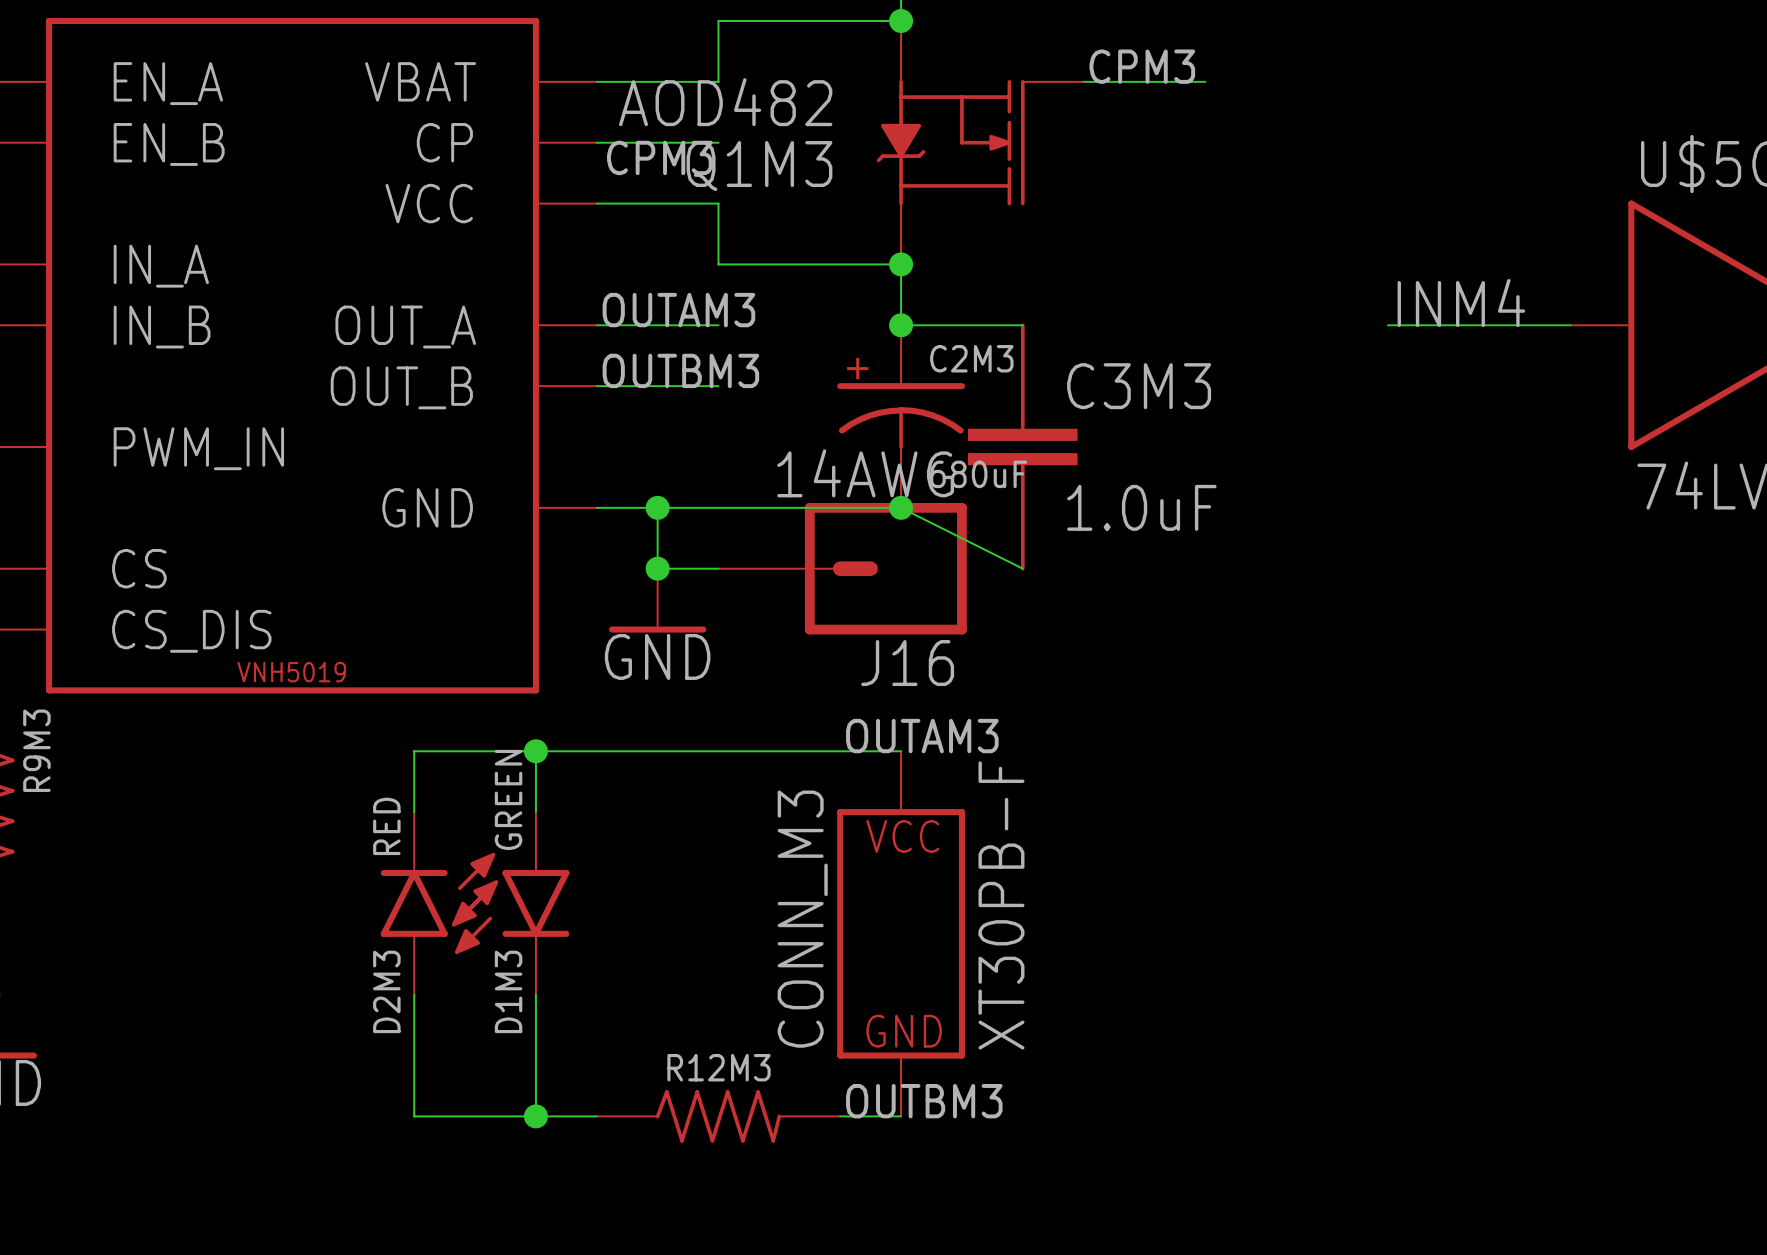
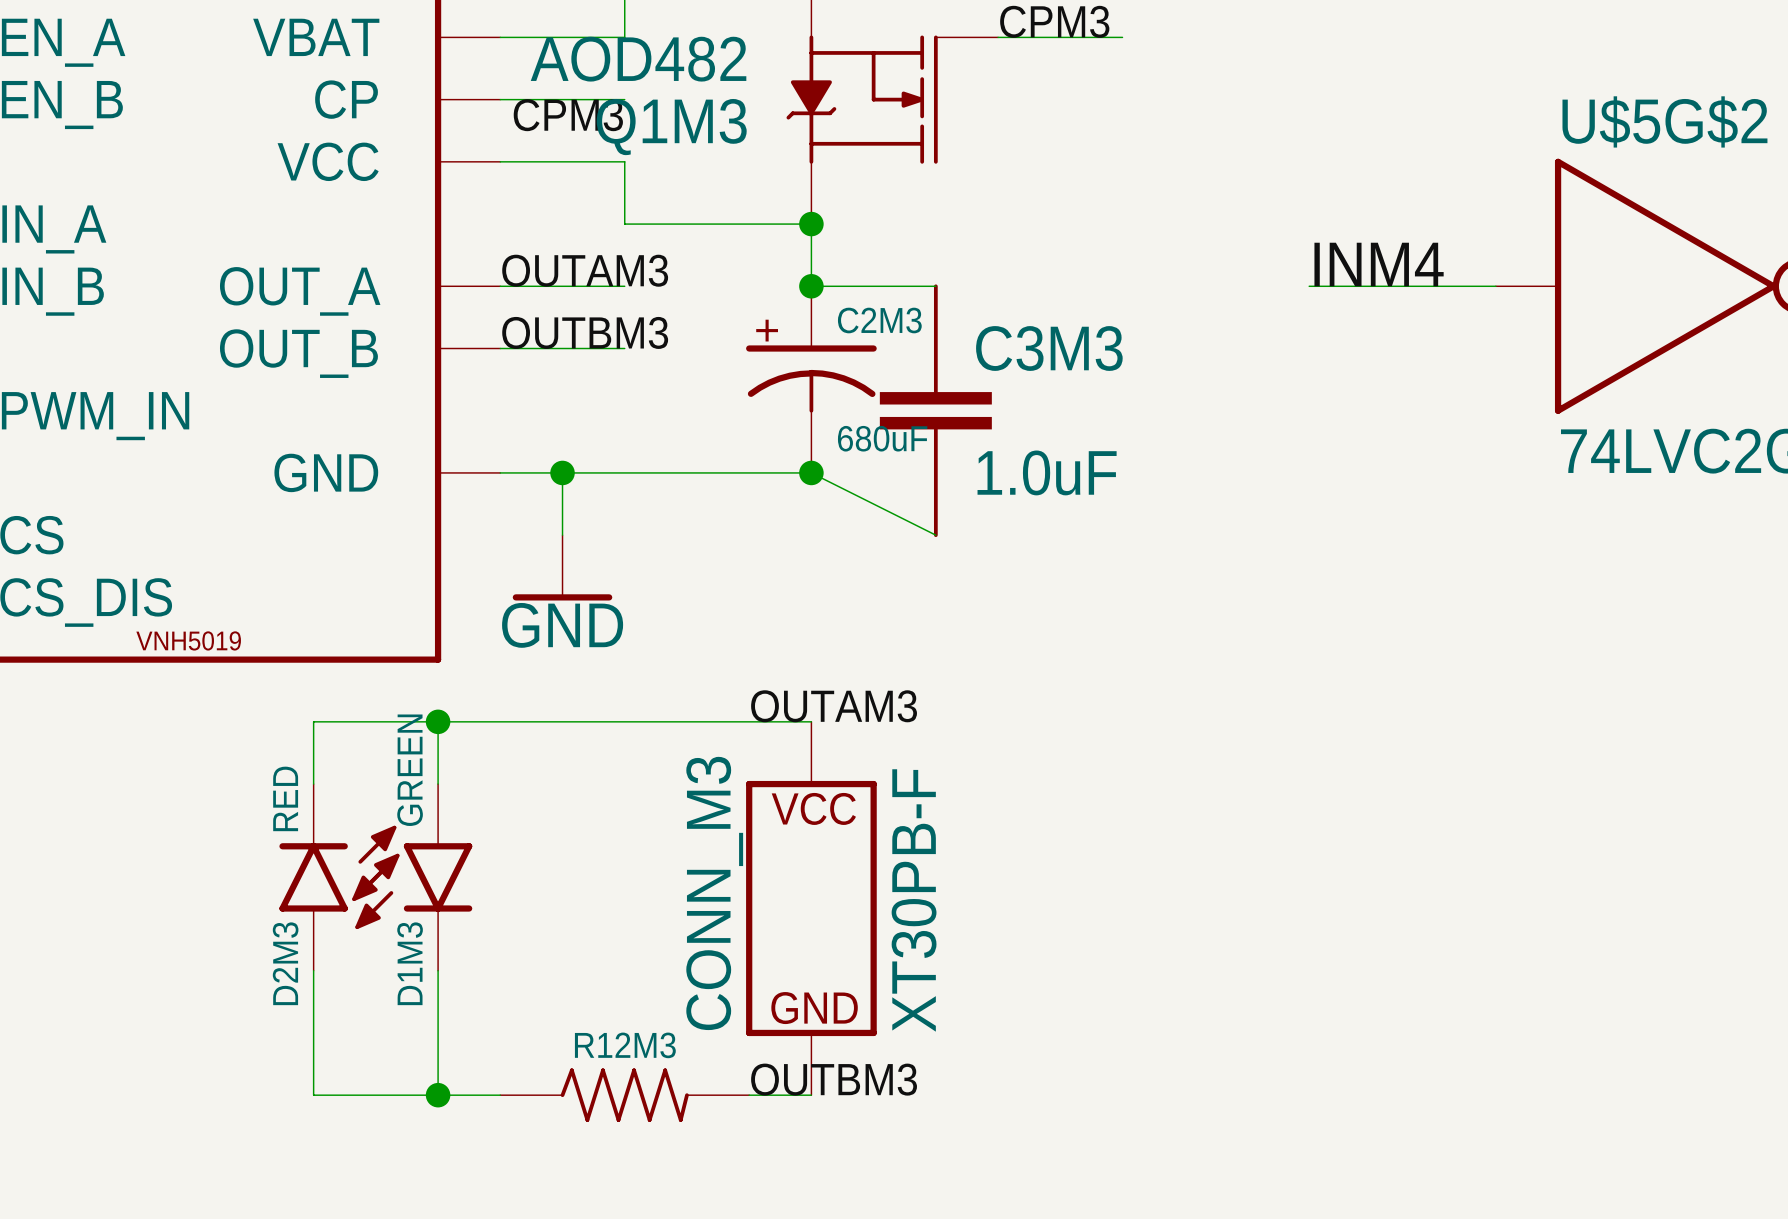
wire: (657, 568) (718, 568) -> none
junction: (657, 568) -> none
J16: 14AWG (842, 568) -> none

